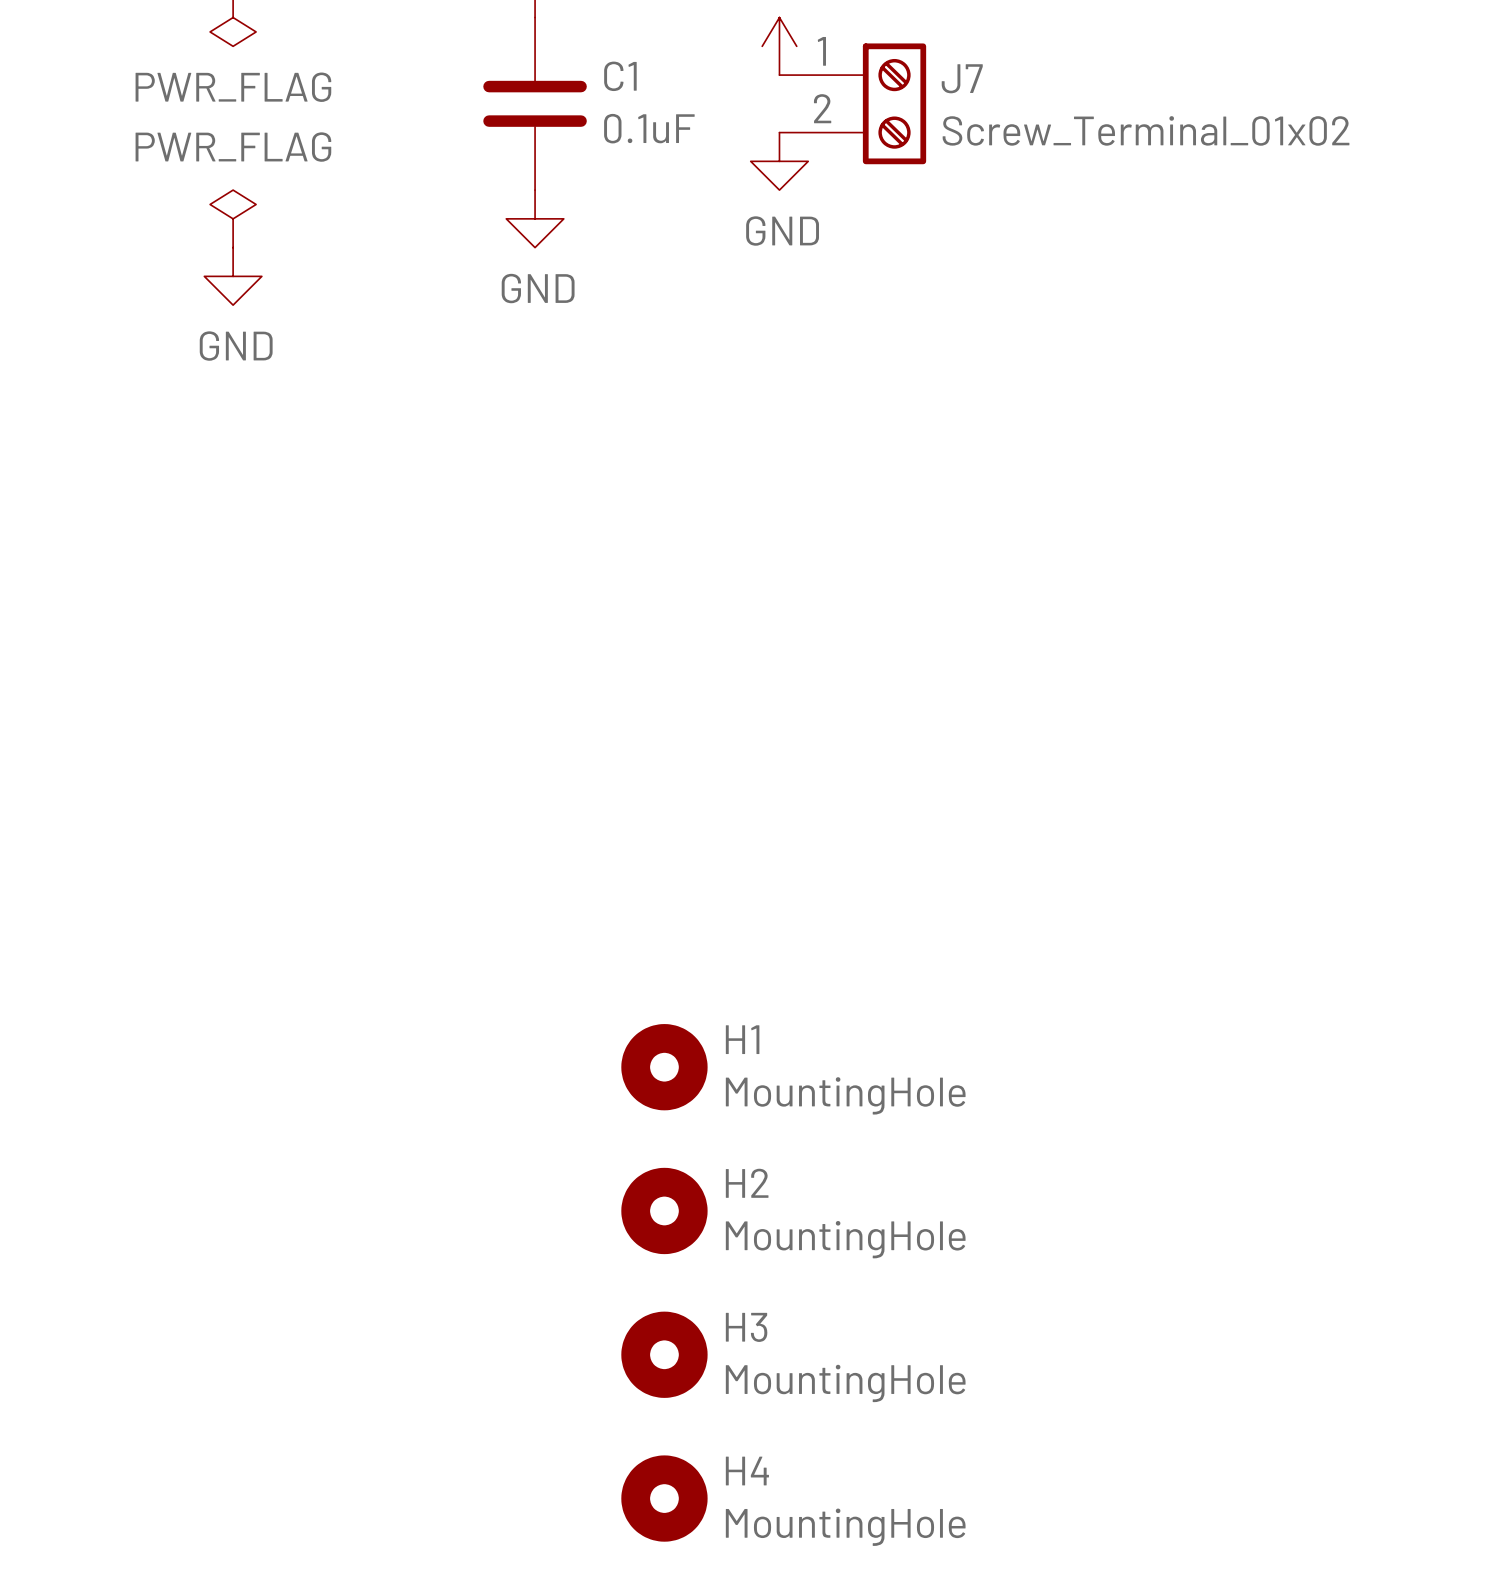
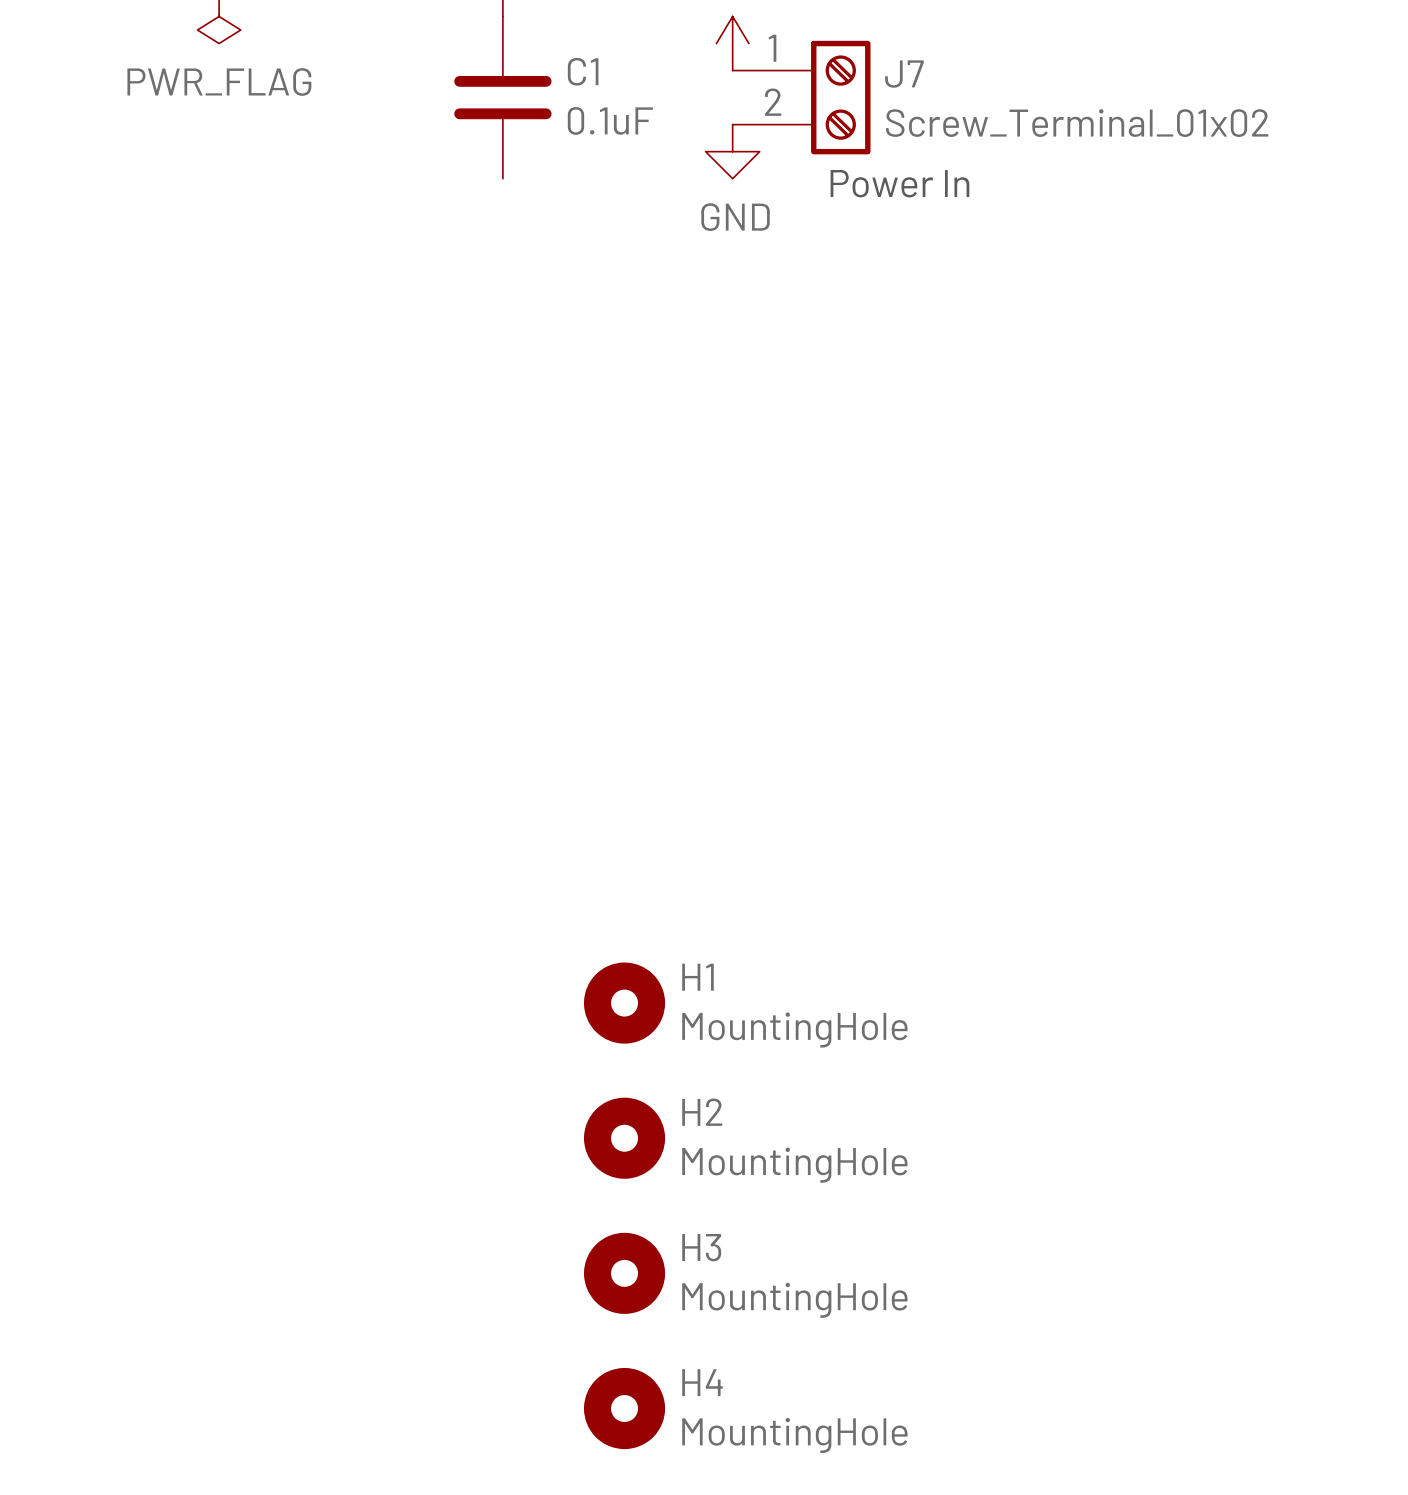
text: none -> Power In (899, 183)
power symbol: PWR_FLAG (233, 218) -> none
power symbol: GND (535, 218) -> none
power symbol: GND (233, 276) -> none

